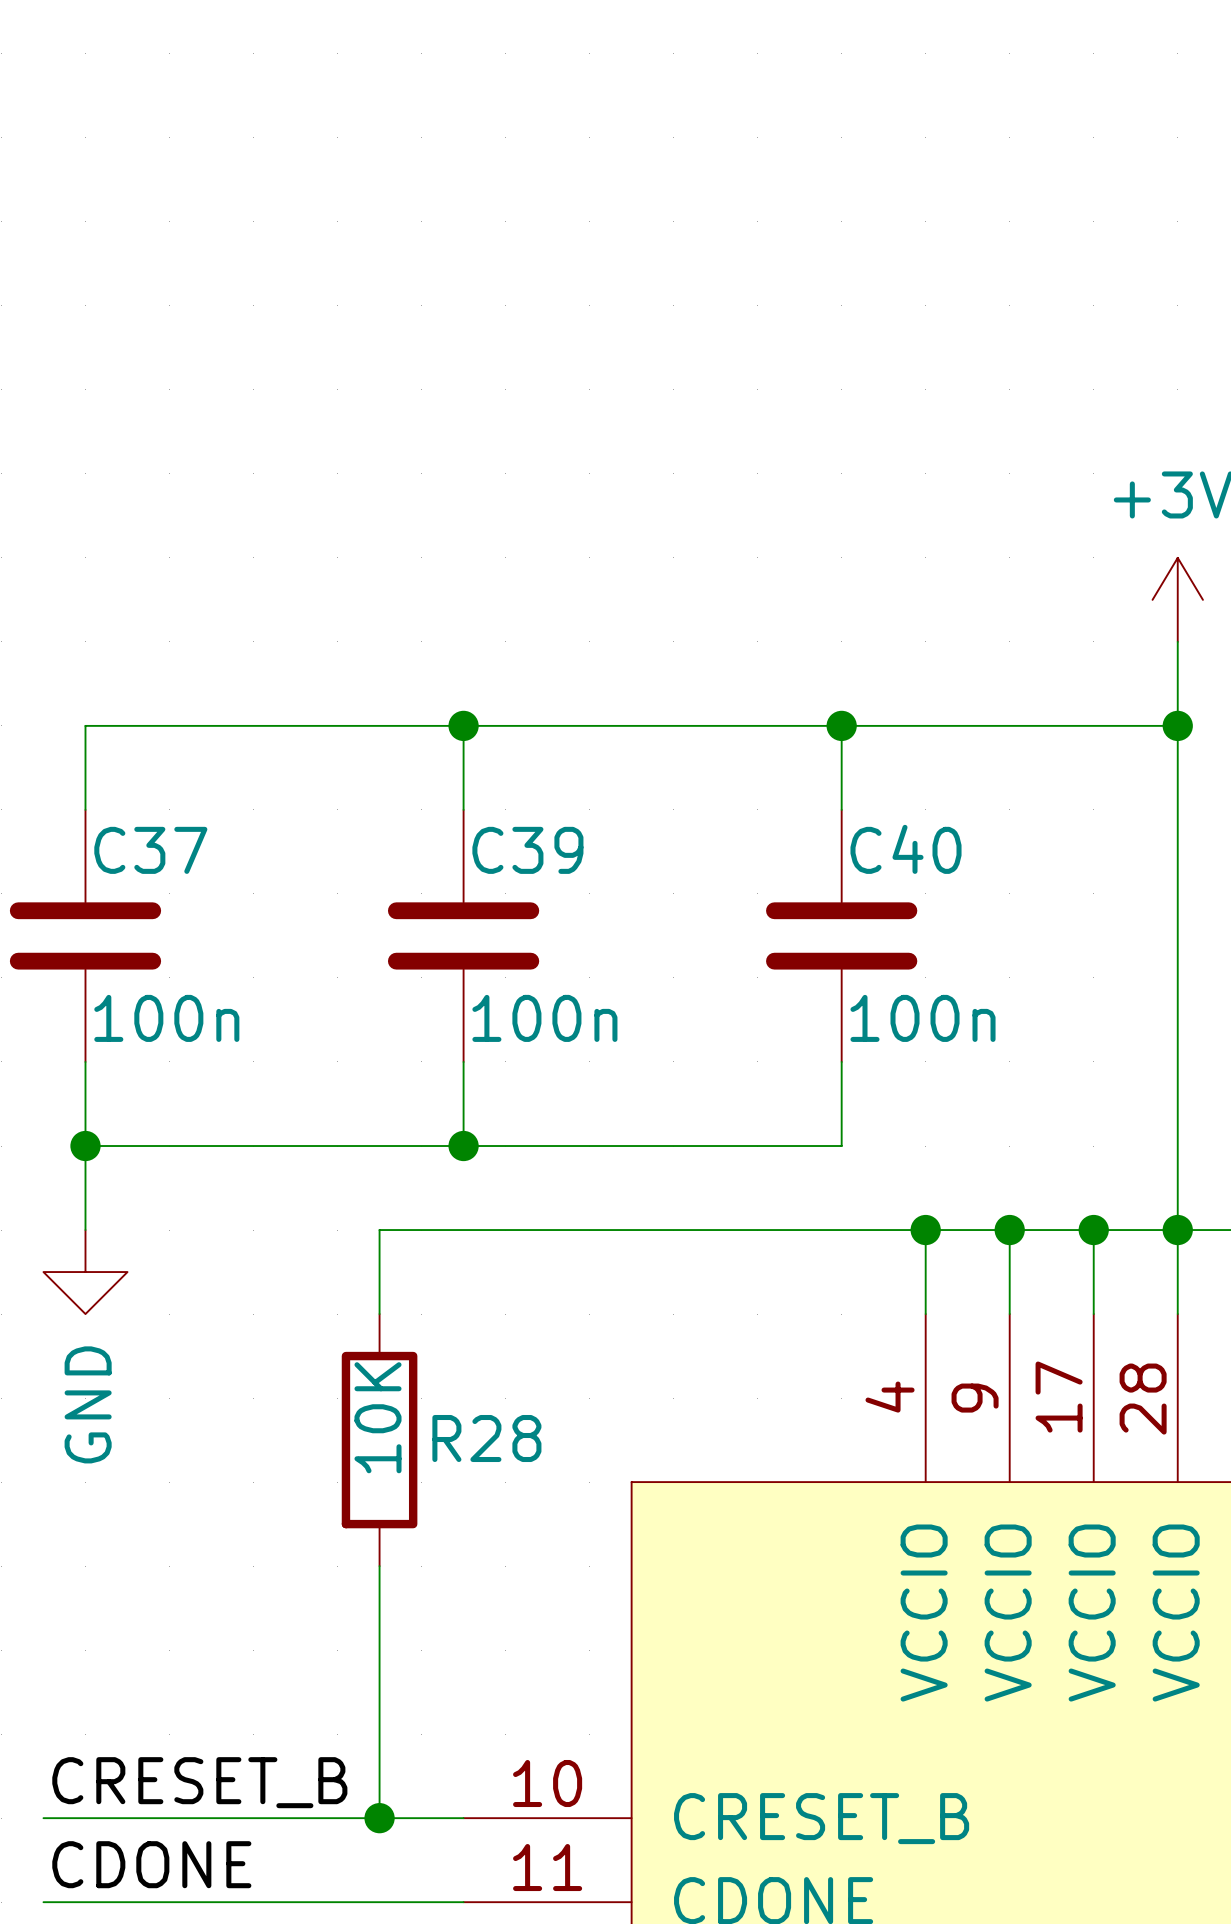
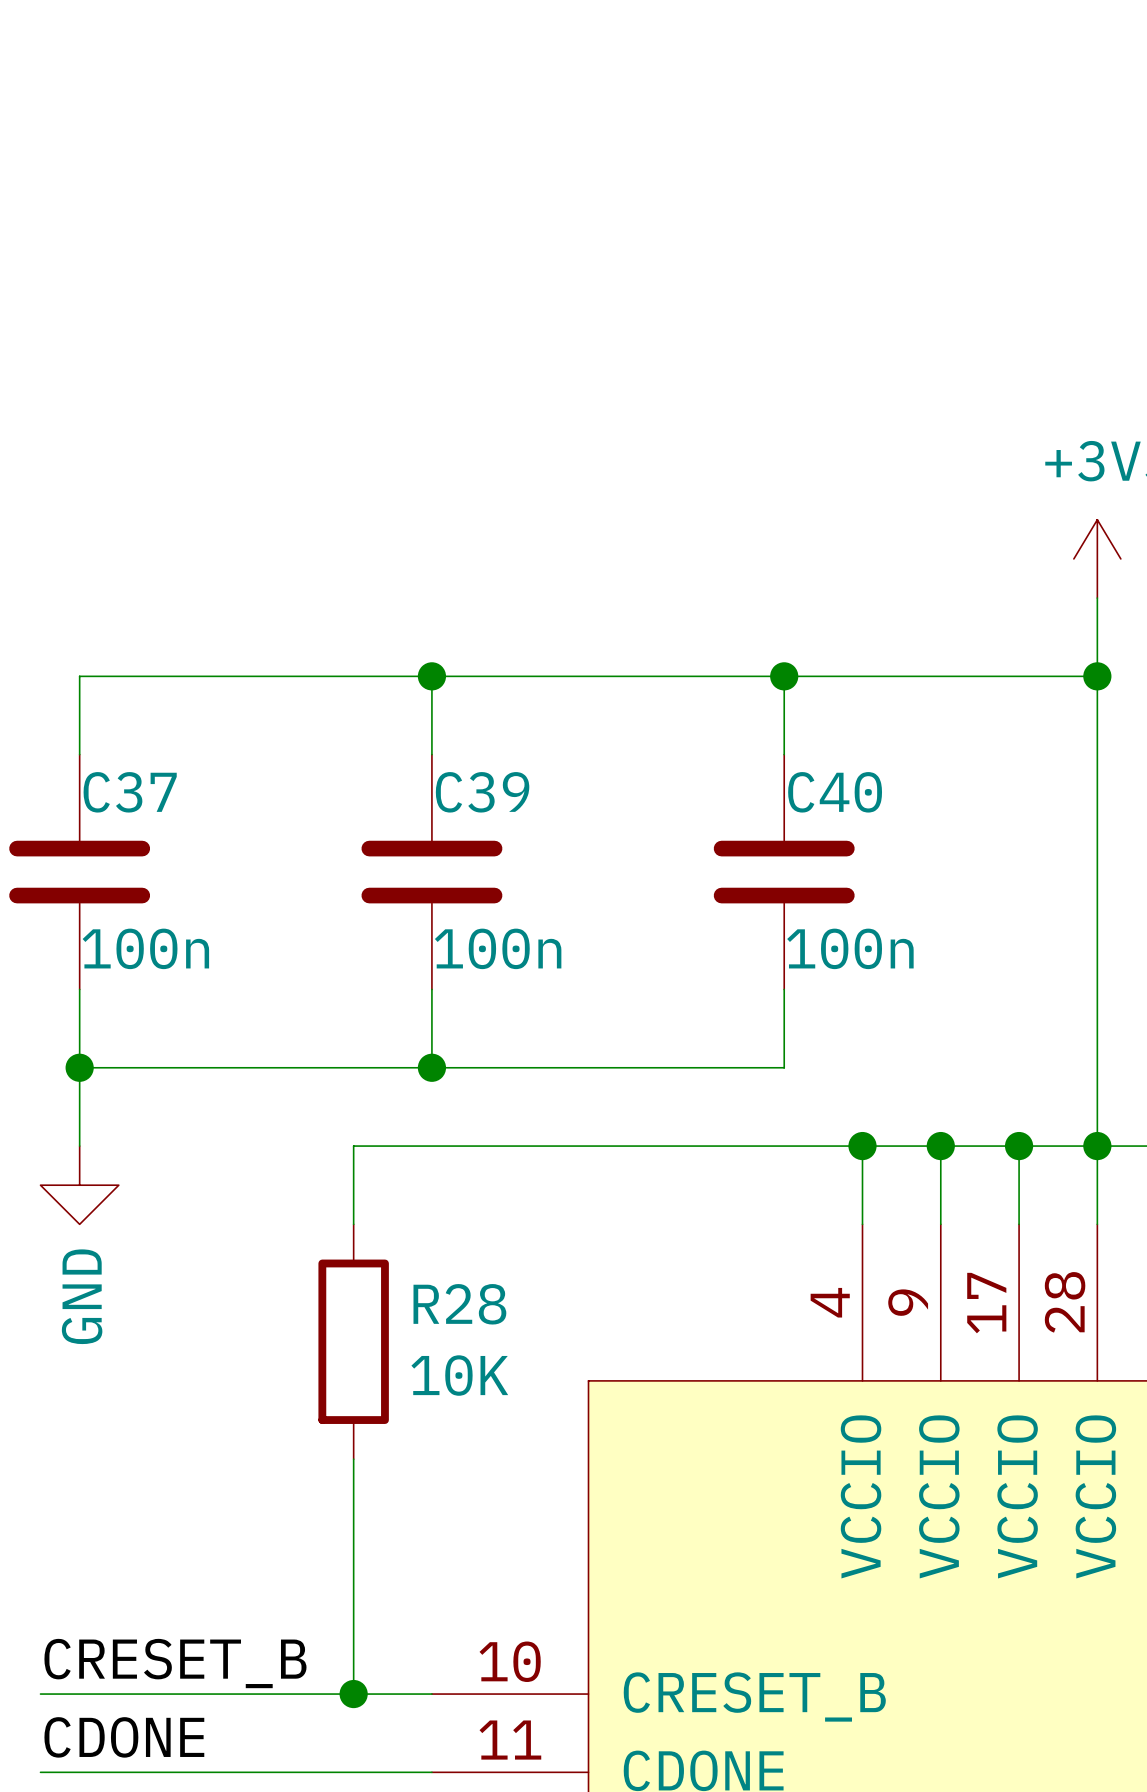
R28 value rotation: 0° (377, 1417) -> 90° clockwise (459, 1375)
R28 value position: 10K (377, 1417) -> 10K (459, 1375)
R28 name position: R28 (486, 1438) -> R28 (459, 1304)

